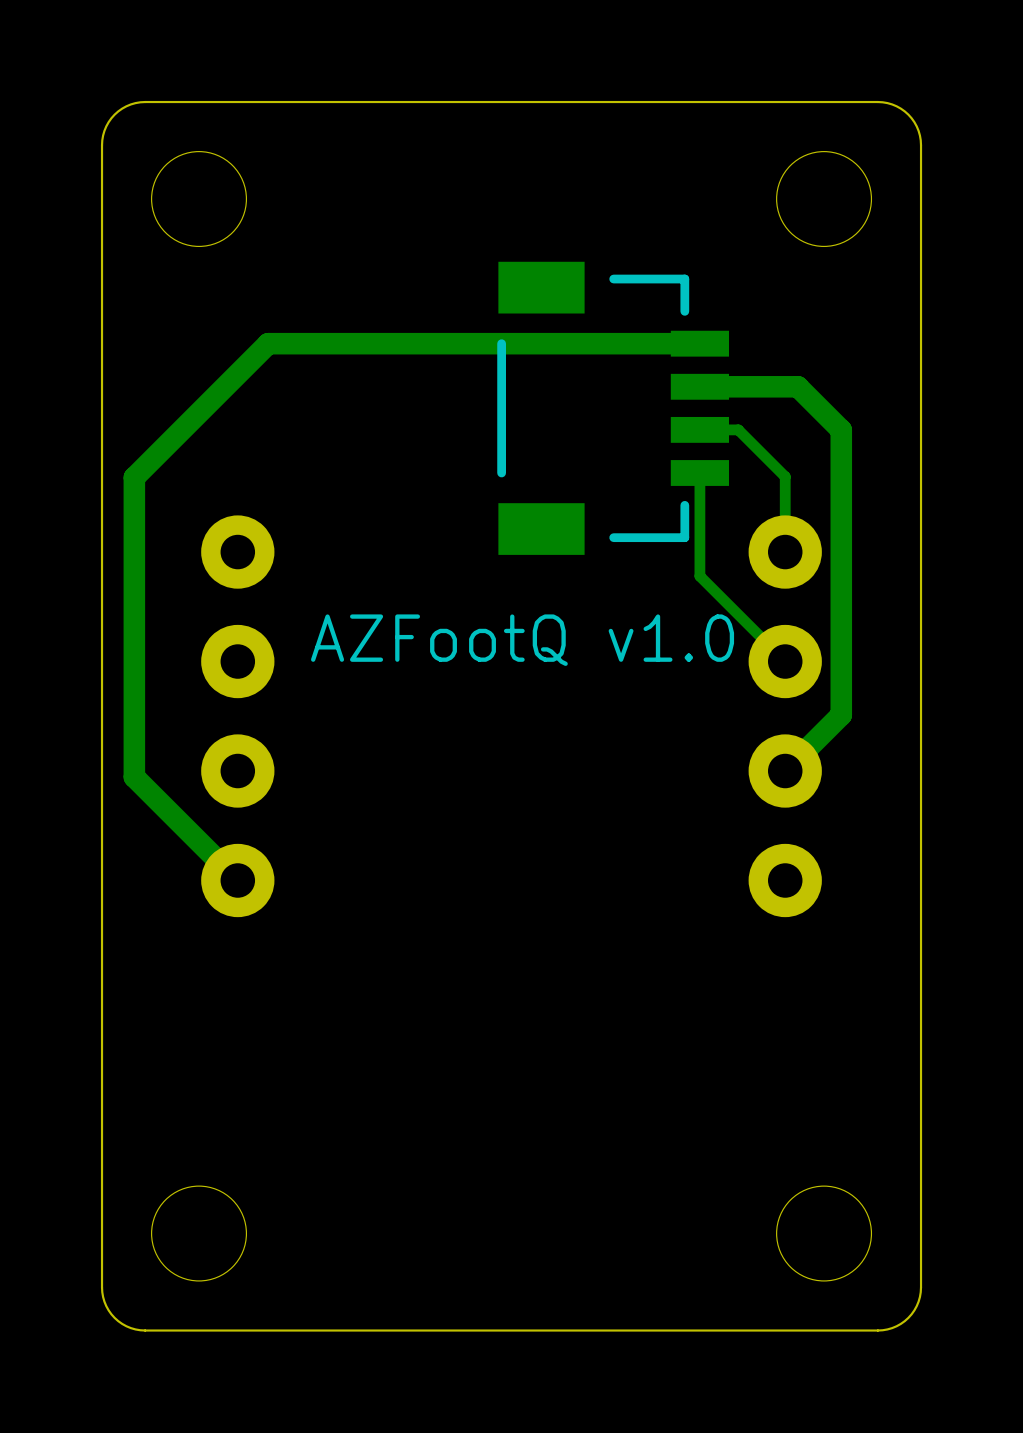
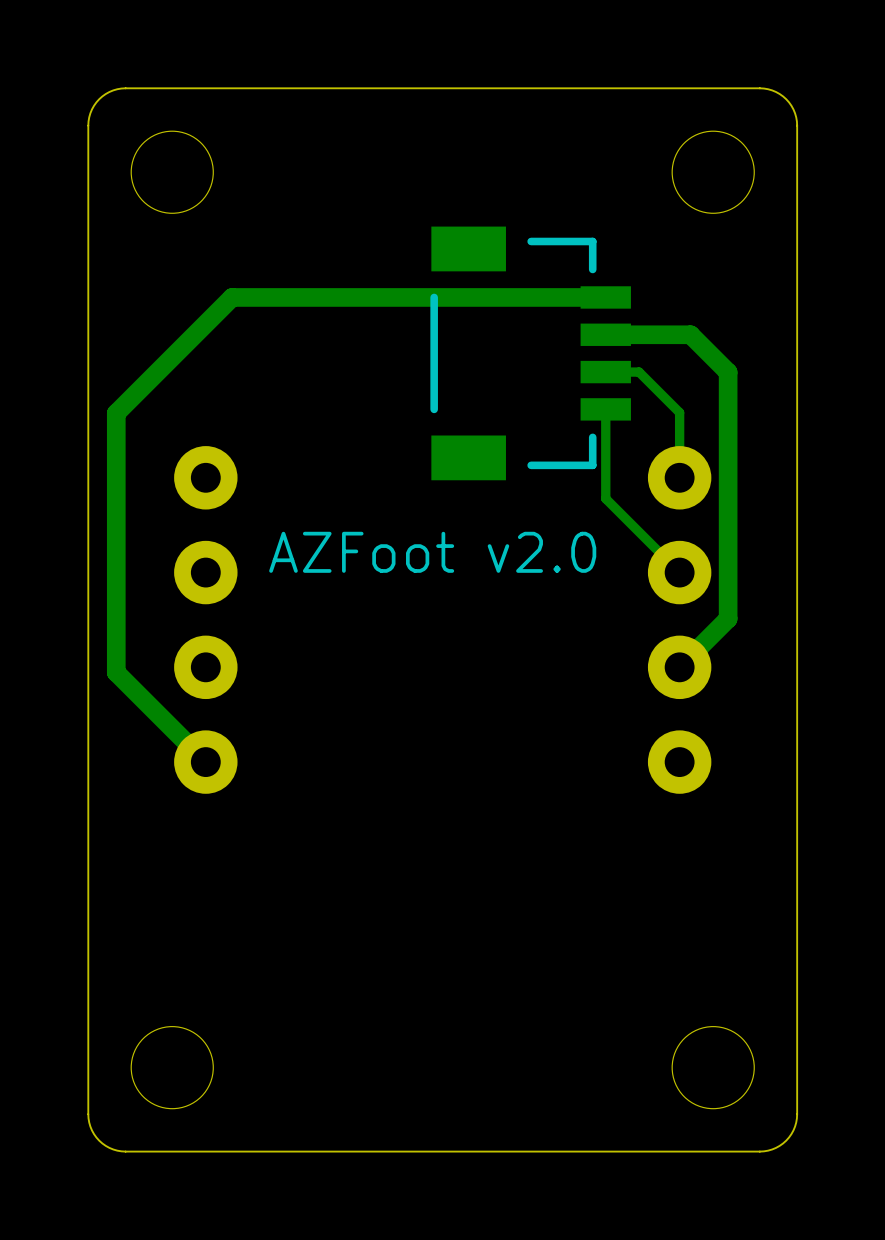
text: AZFootQ v1.0 (522, 640) -> AZFoot v2.0 (432, 552)

